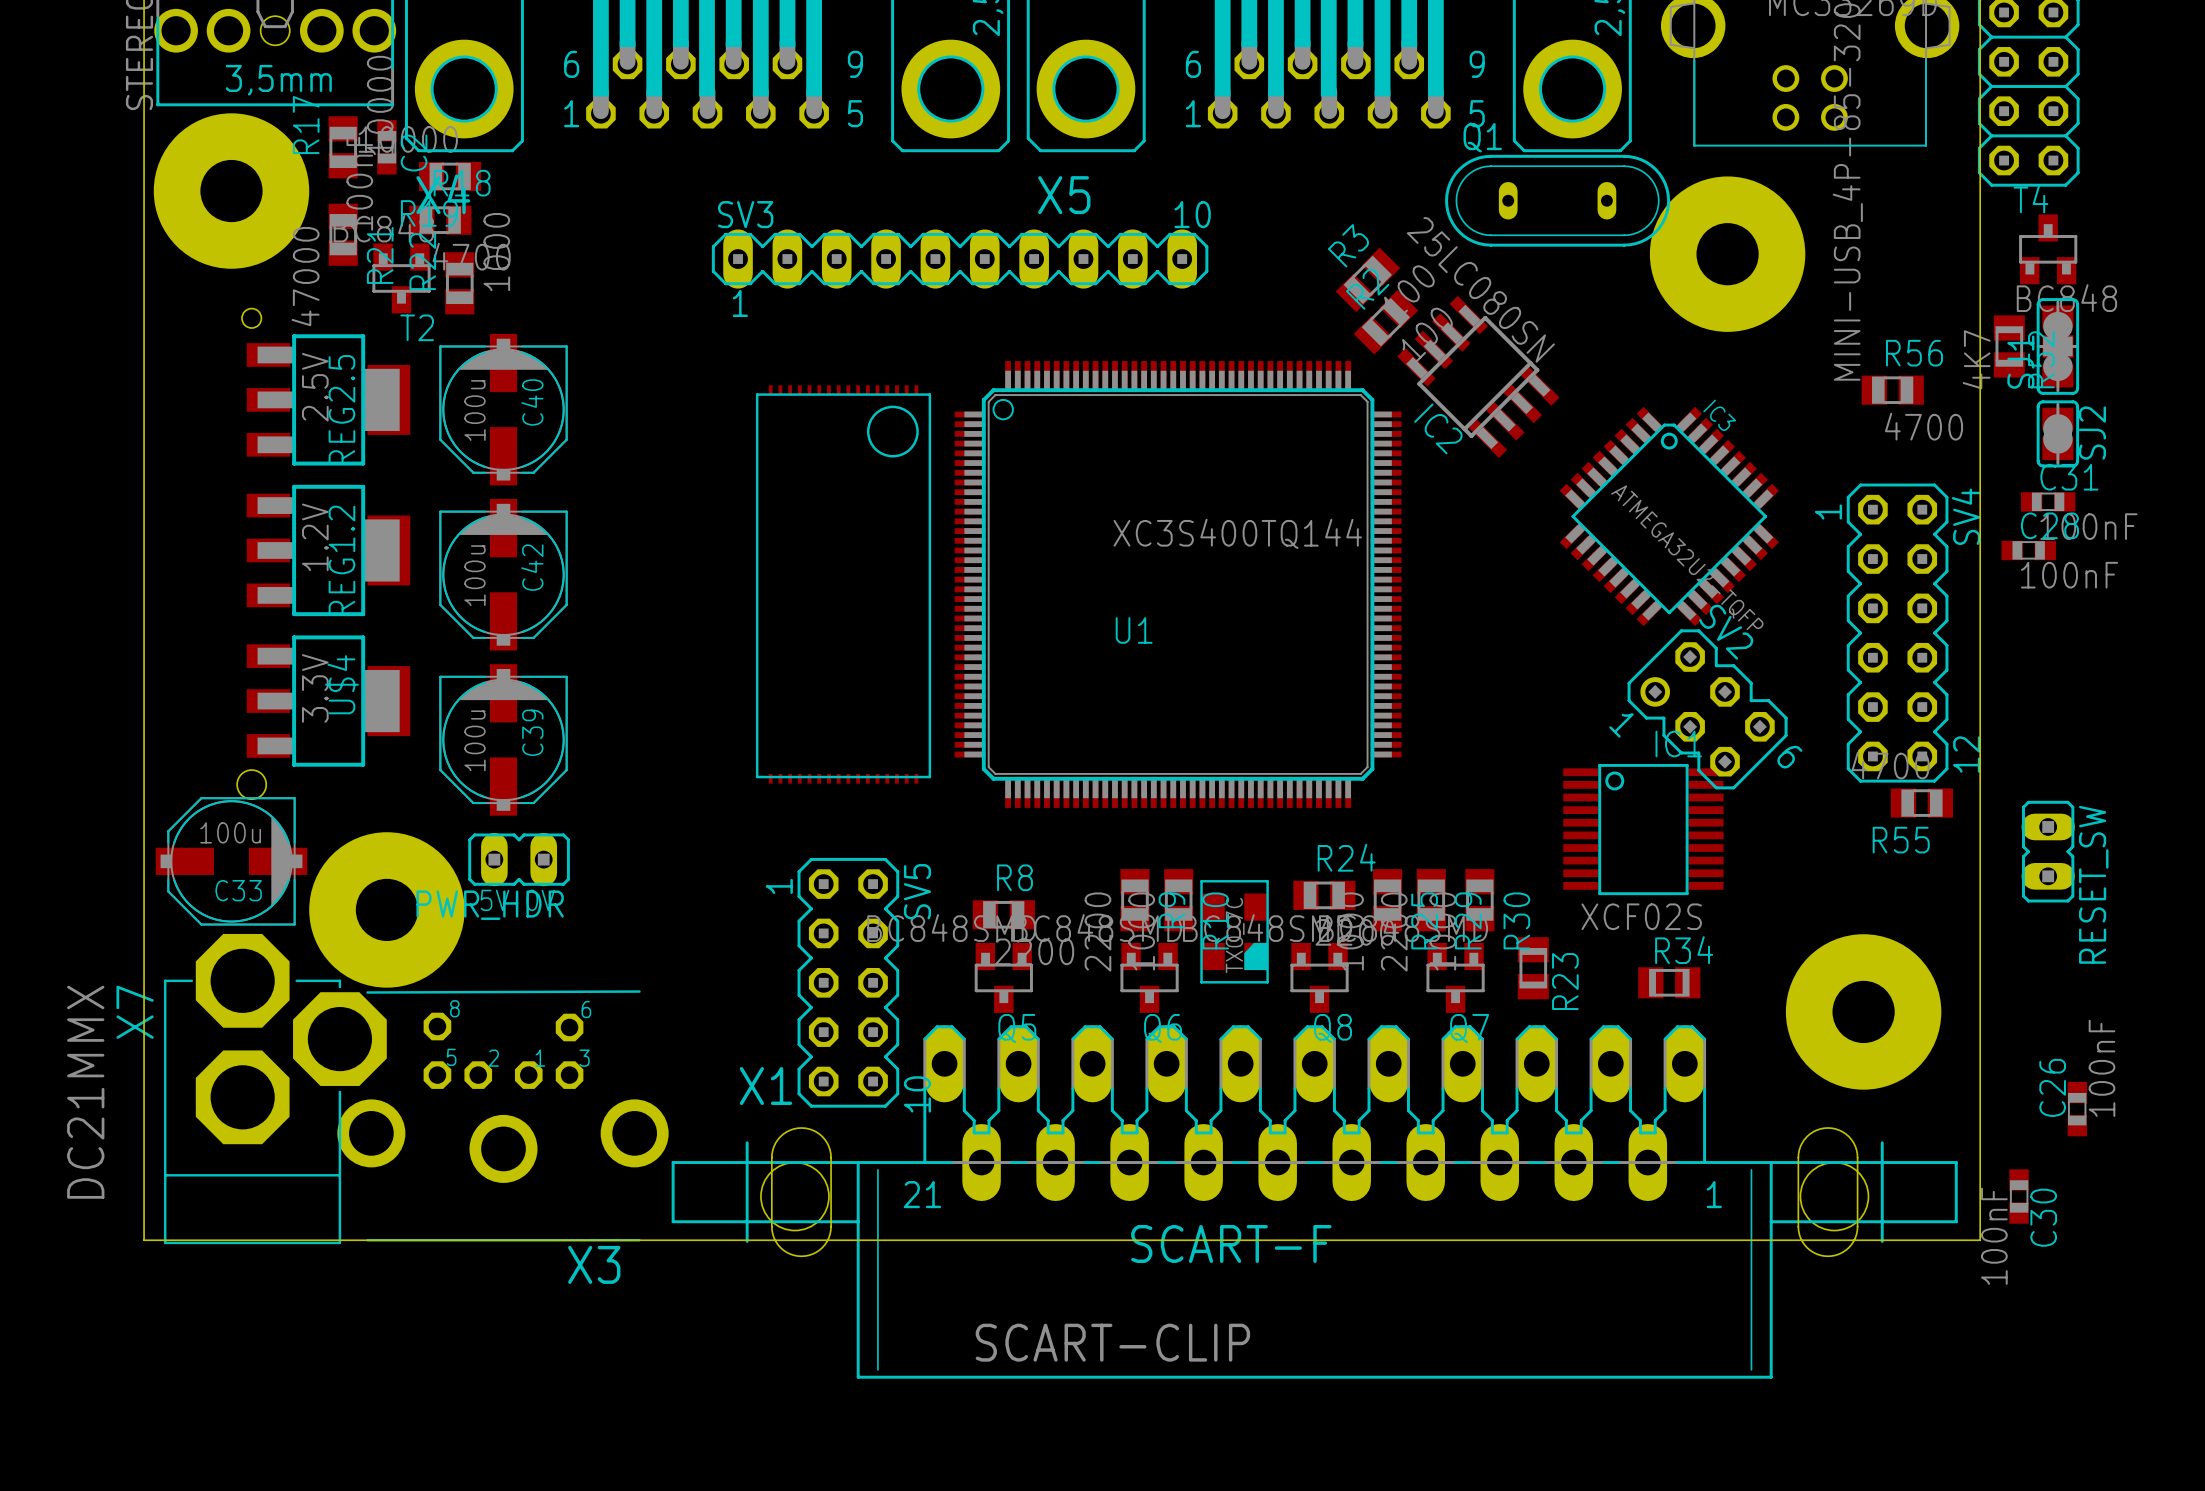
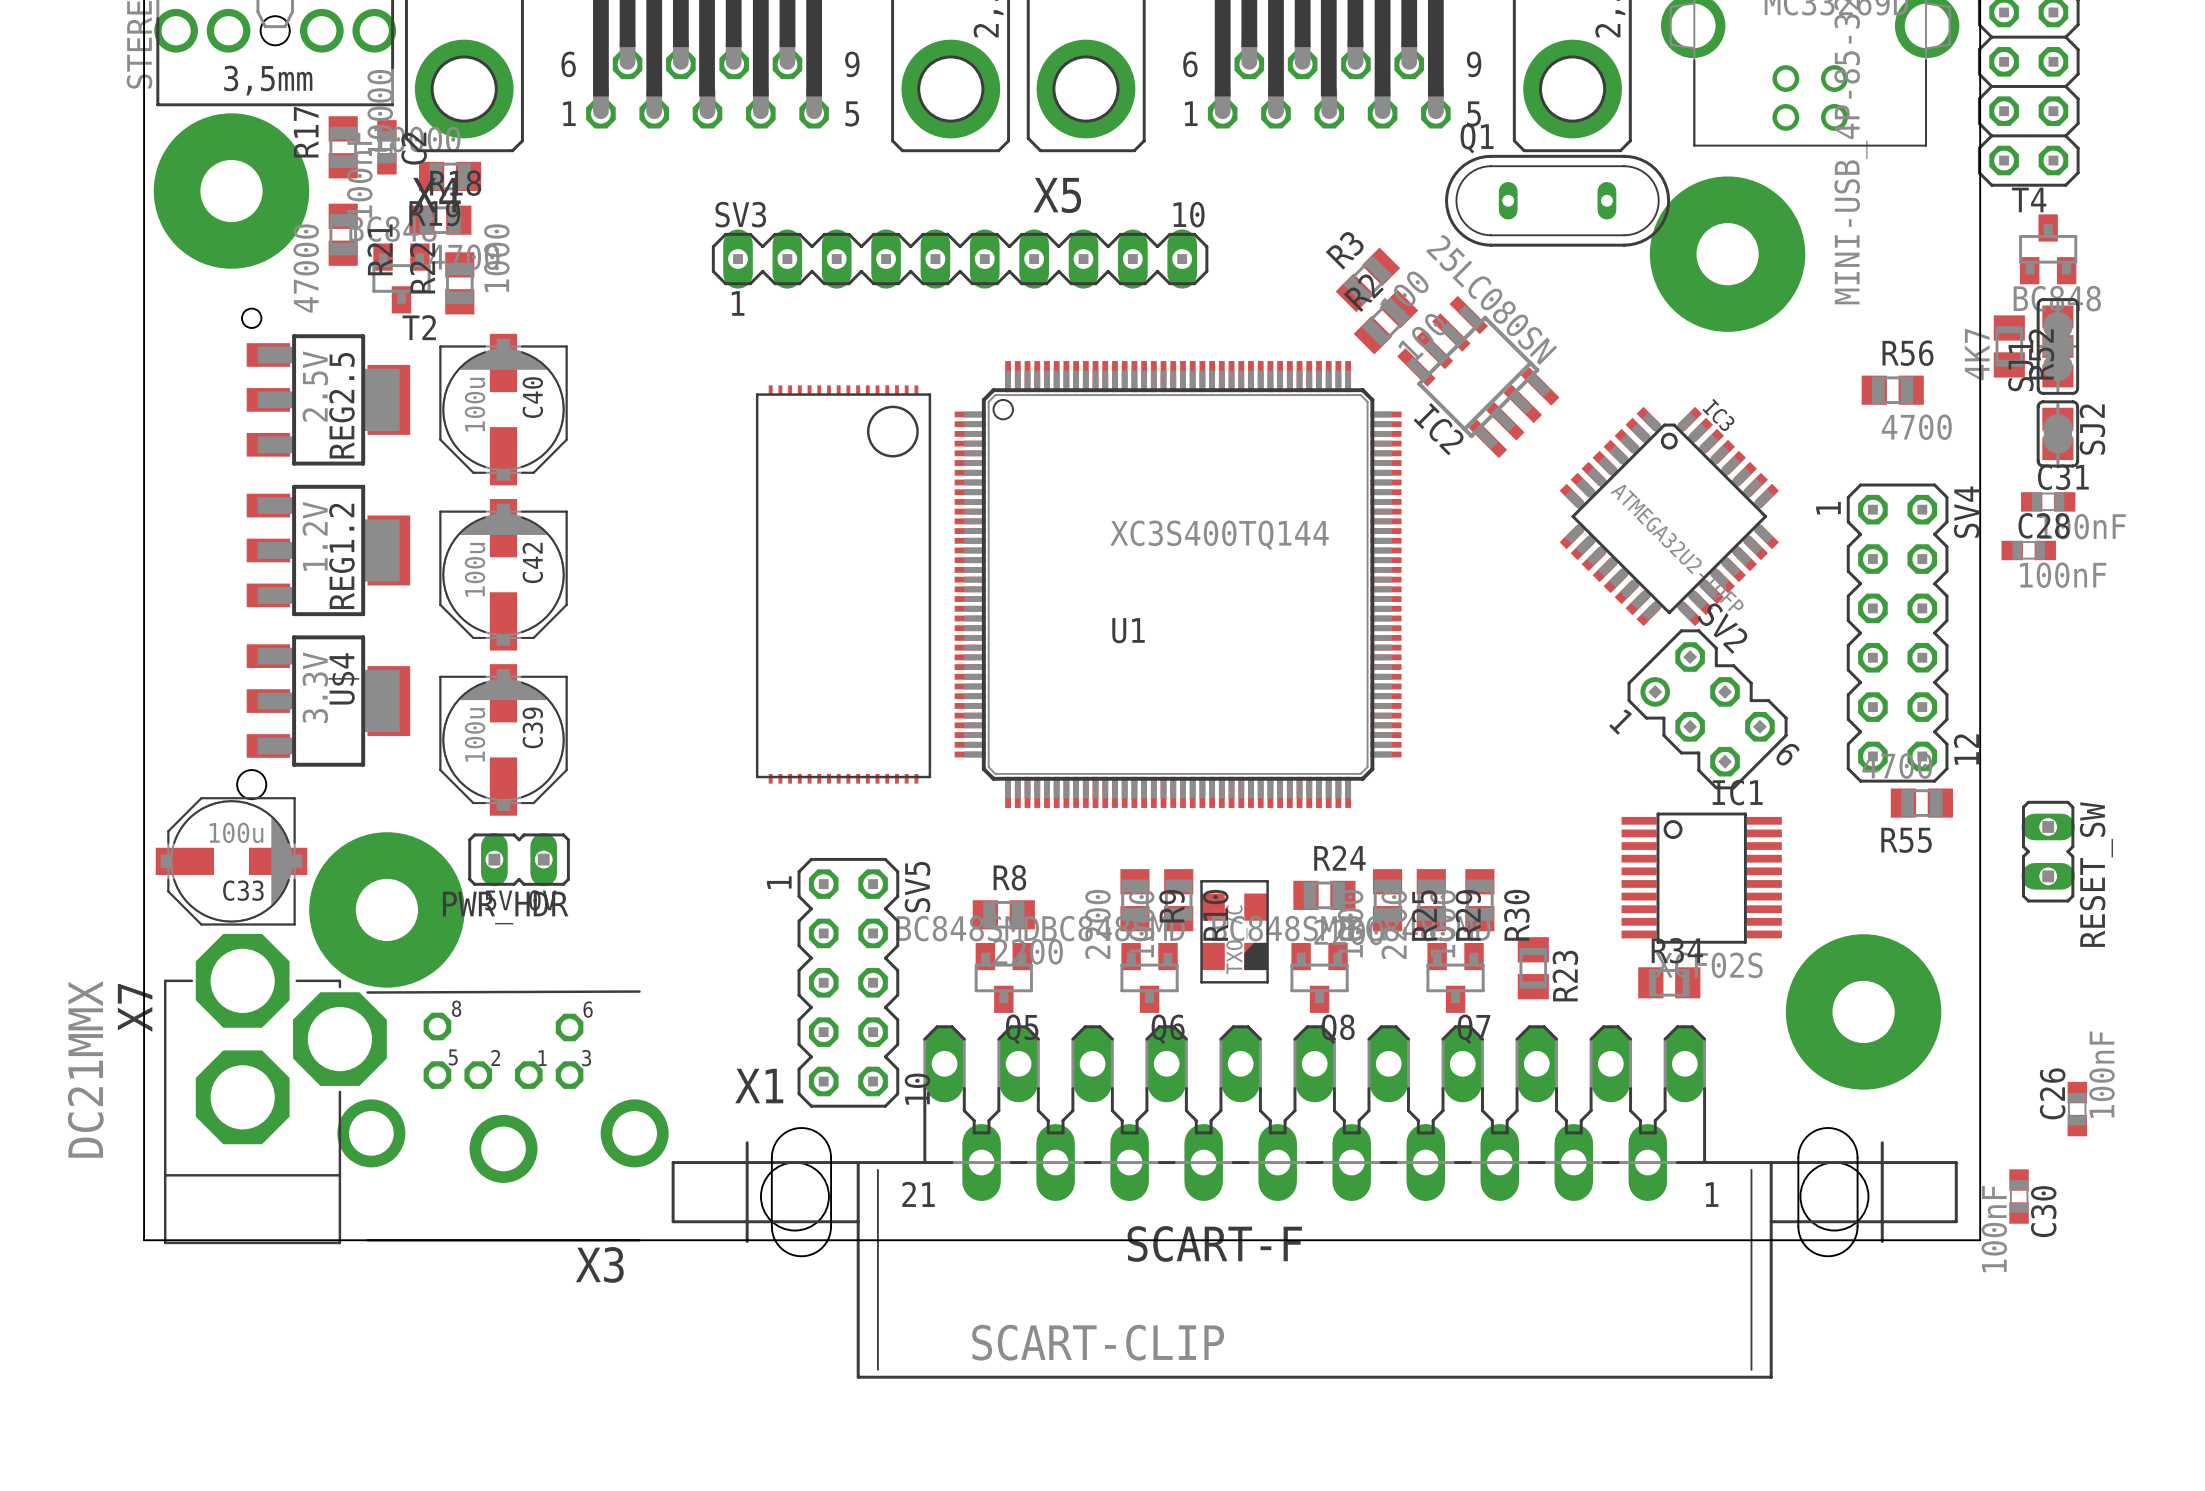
IC1 position: (1643, 829) -> (1701, 878)

